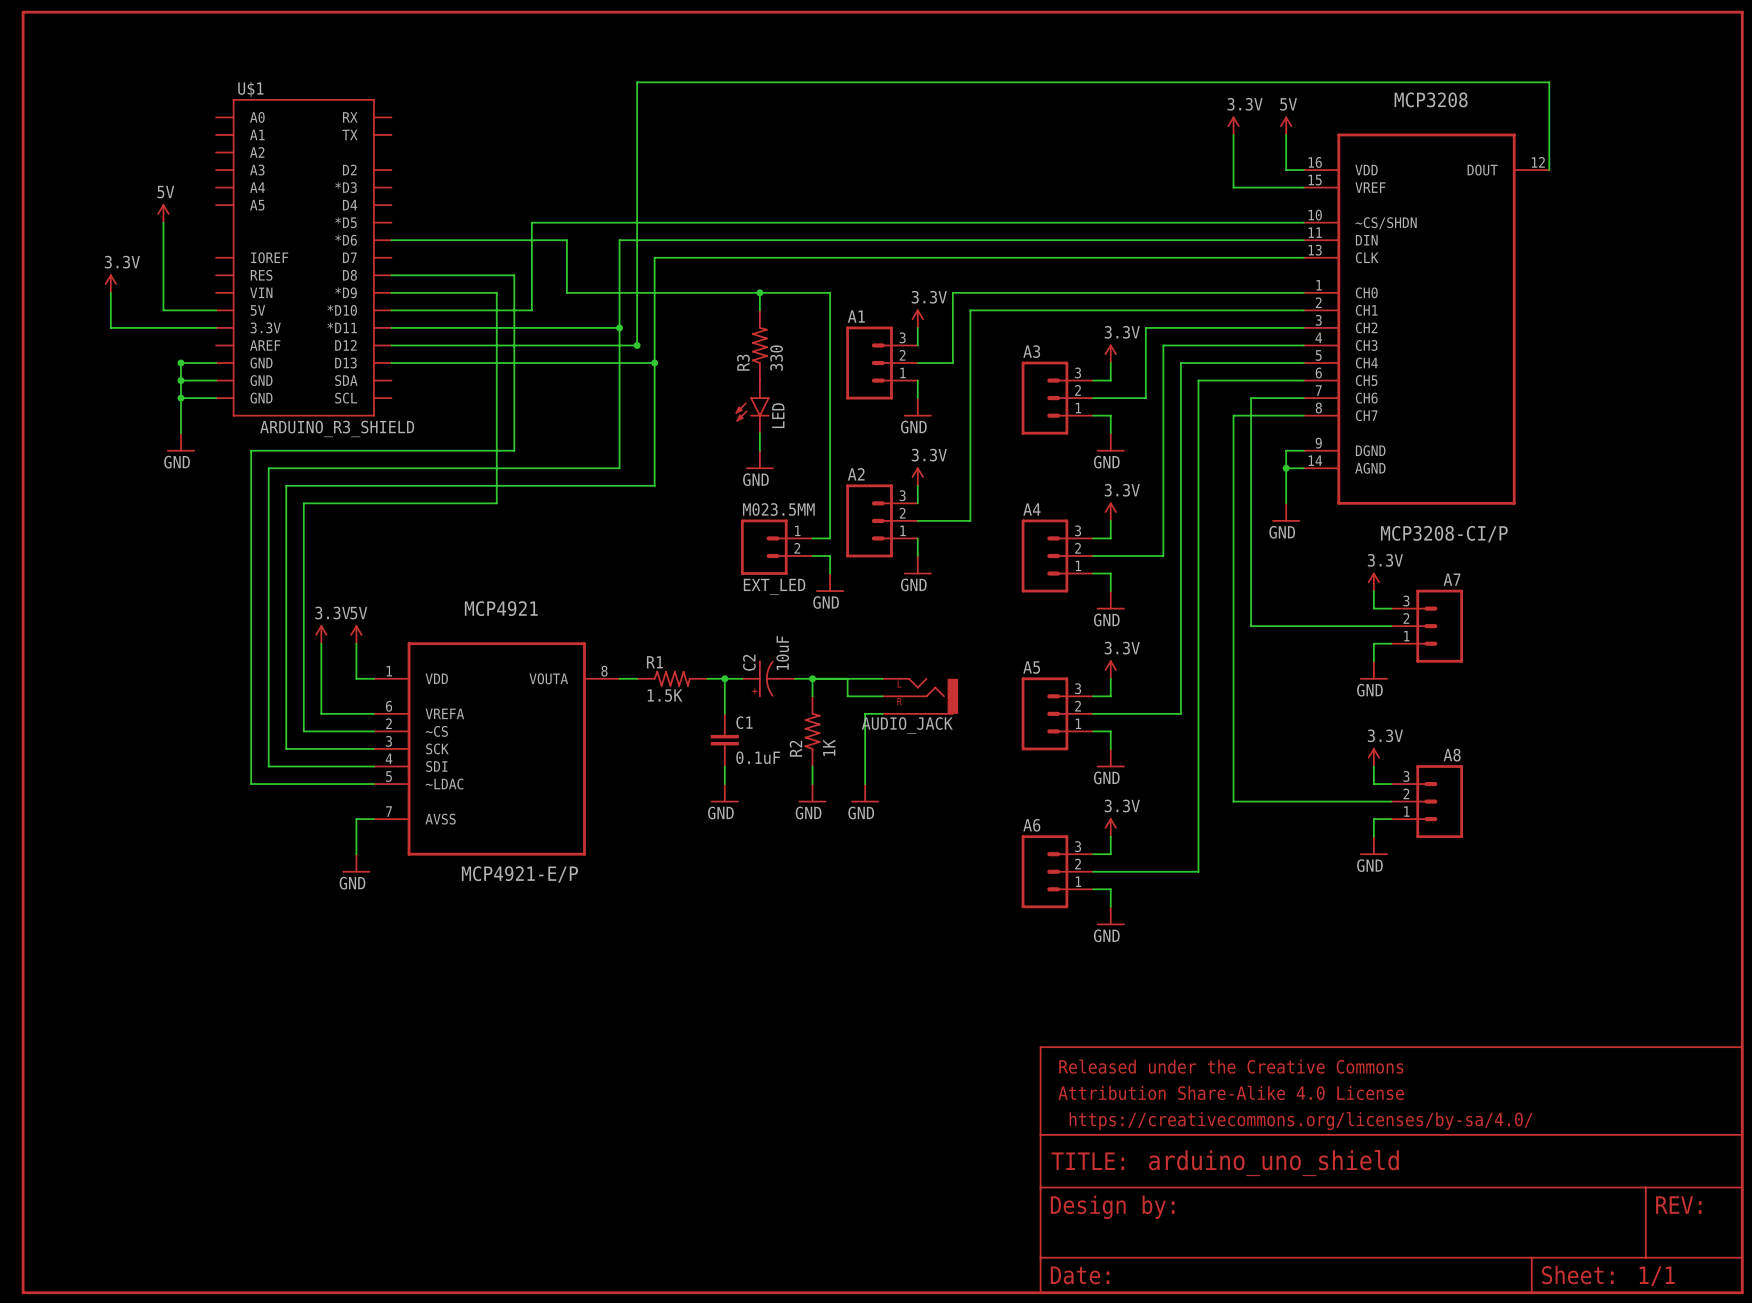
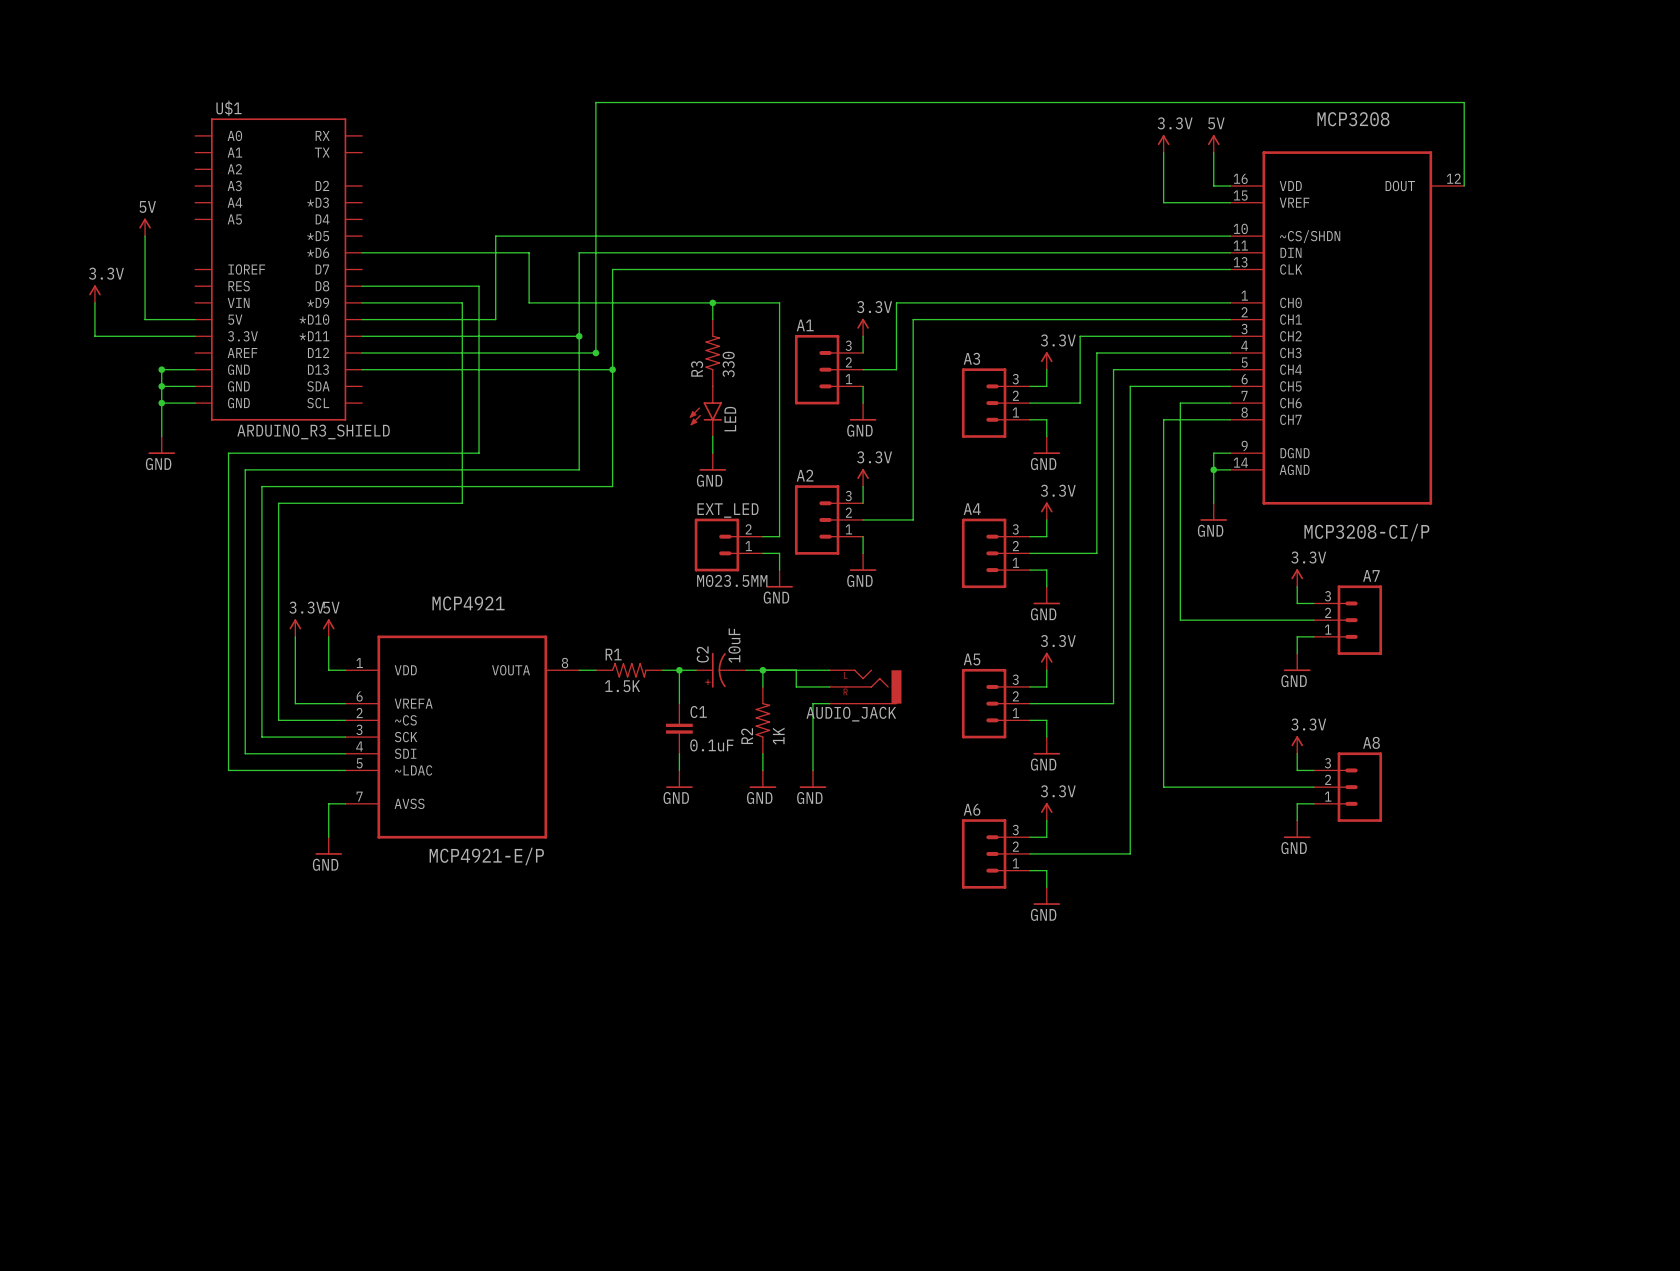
EXT_LED flip: as is (764, 547) -> up-down (716, 545)
part: (882, 652) -> none
part: (1391, 1169) -> none

